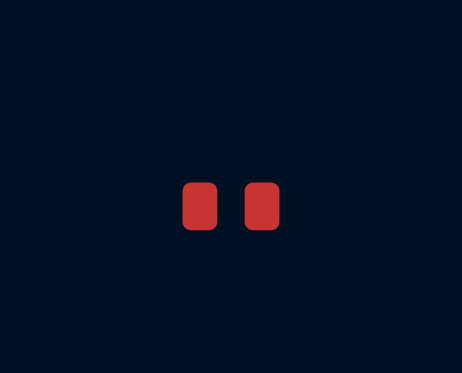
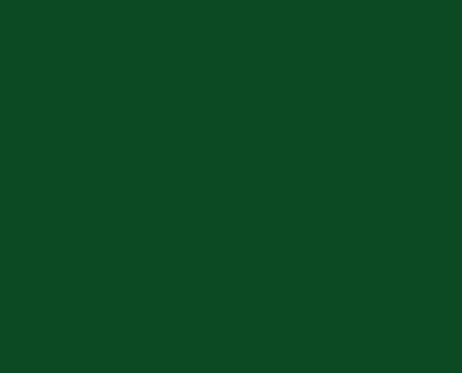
part: (230, 206) -> none

